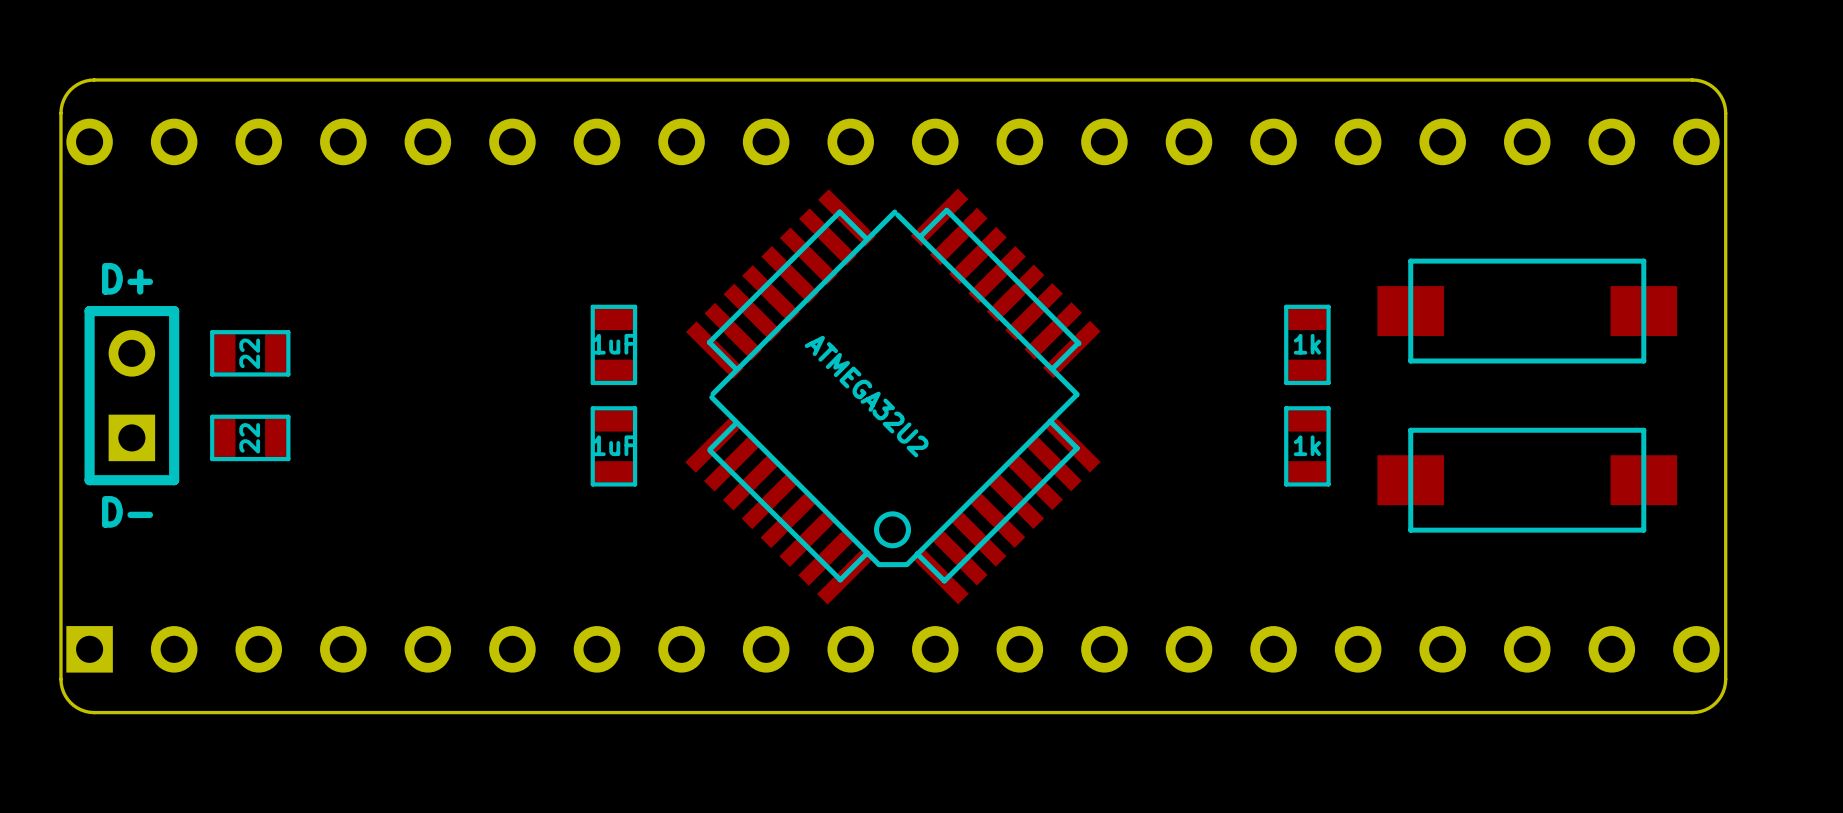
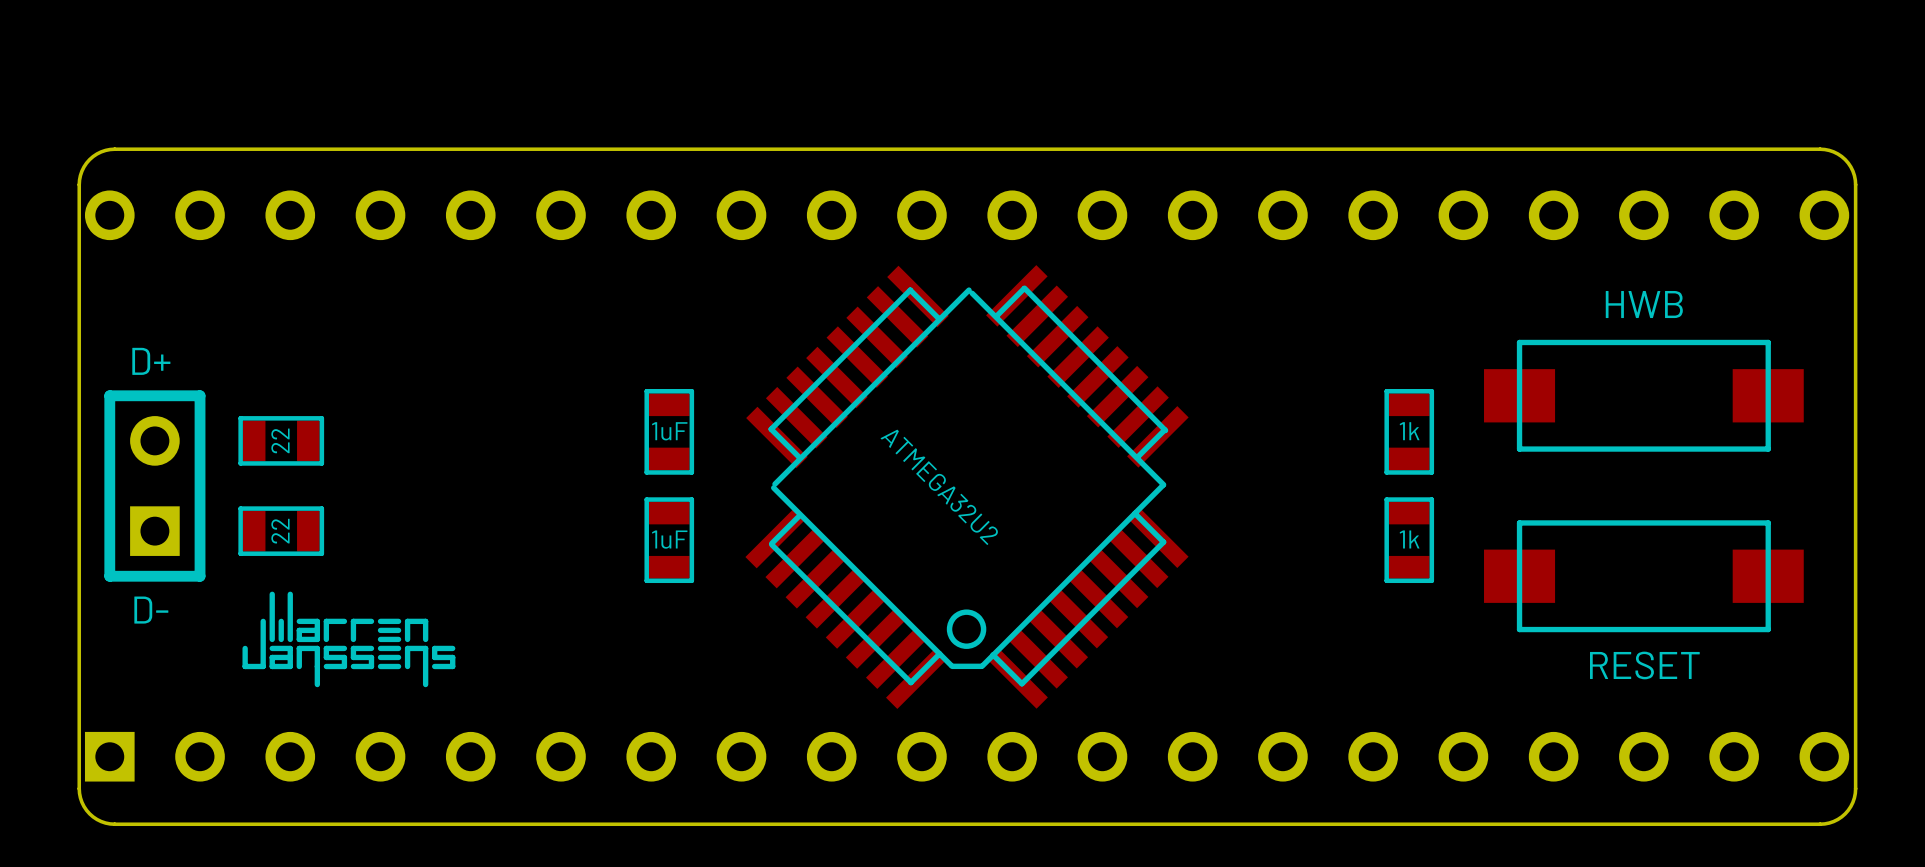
text: none -> HWB (1644, 304)
drawing: none -> [242, 591, 456, 688]
text: none -> RESET (1644, 665)

